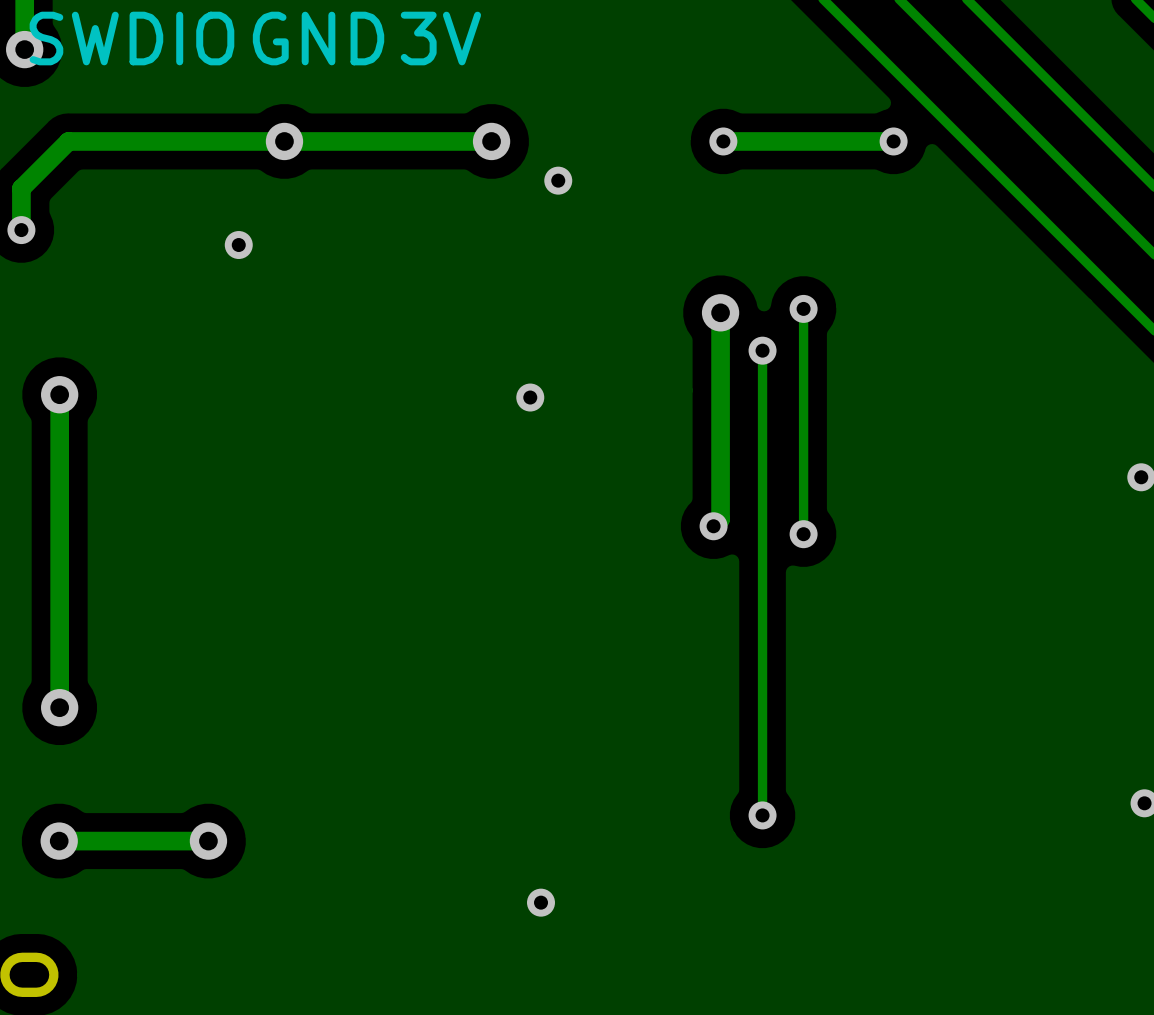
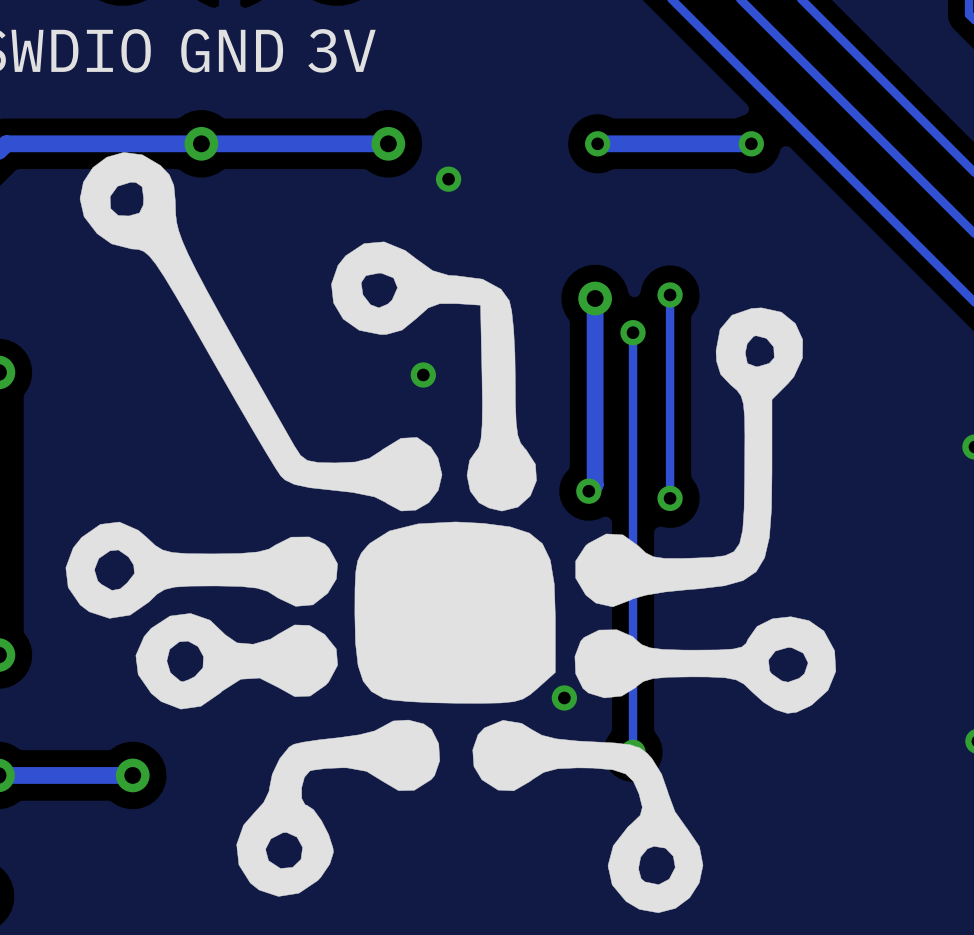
drawing: none -> [65, 152, 837, 913]
via position: (541, 902) -> (564, 697)

